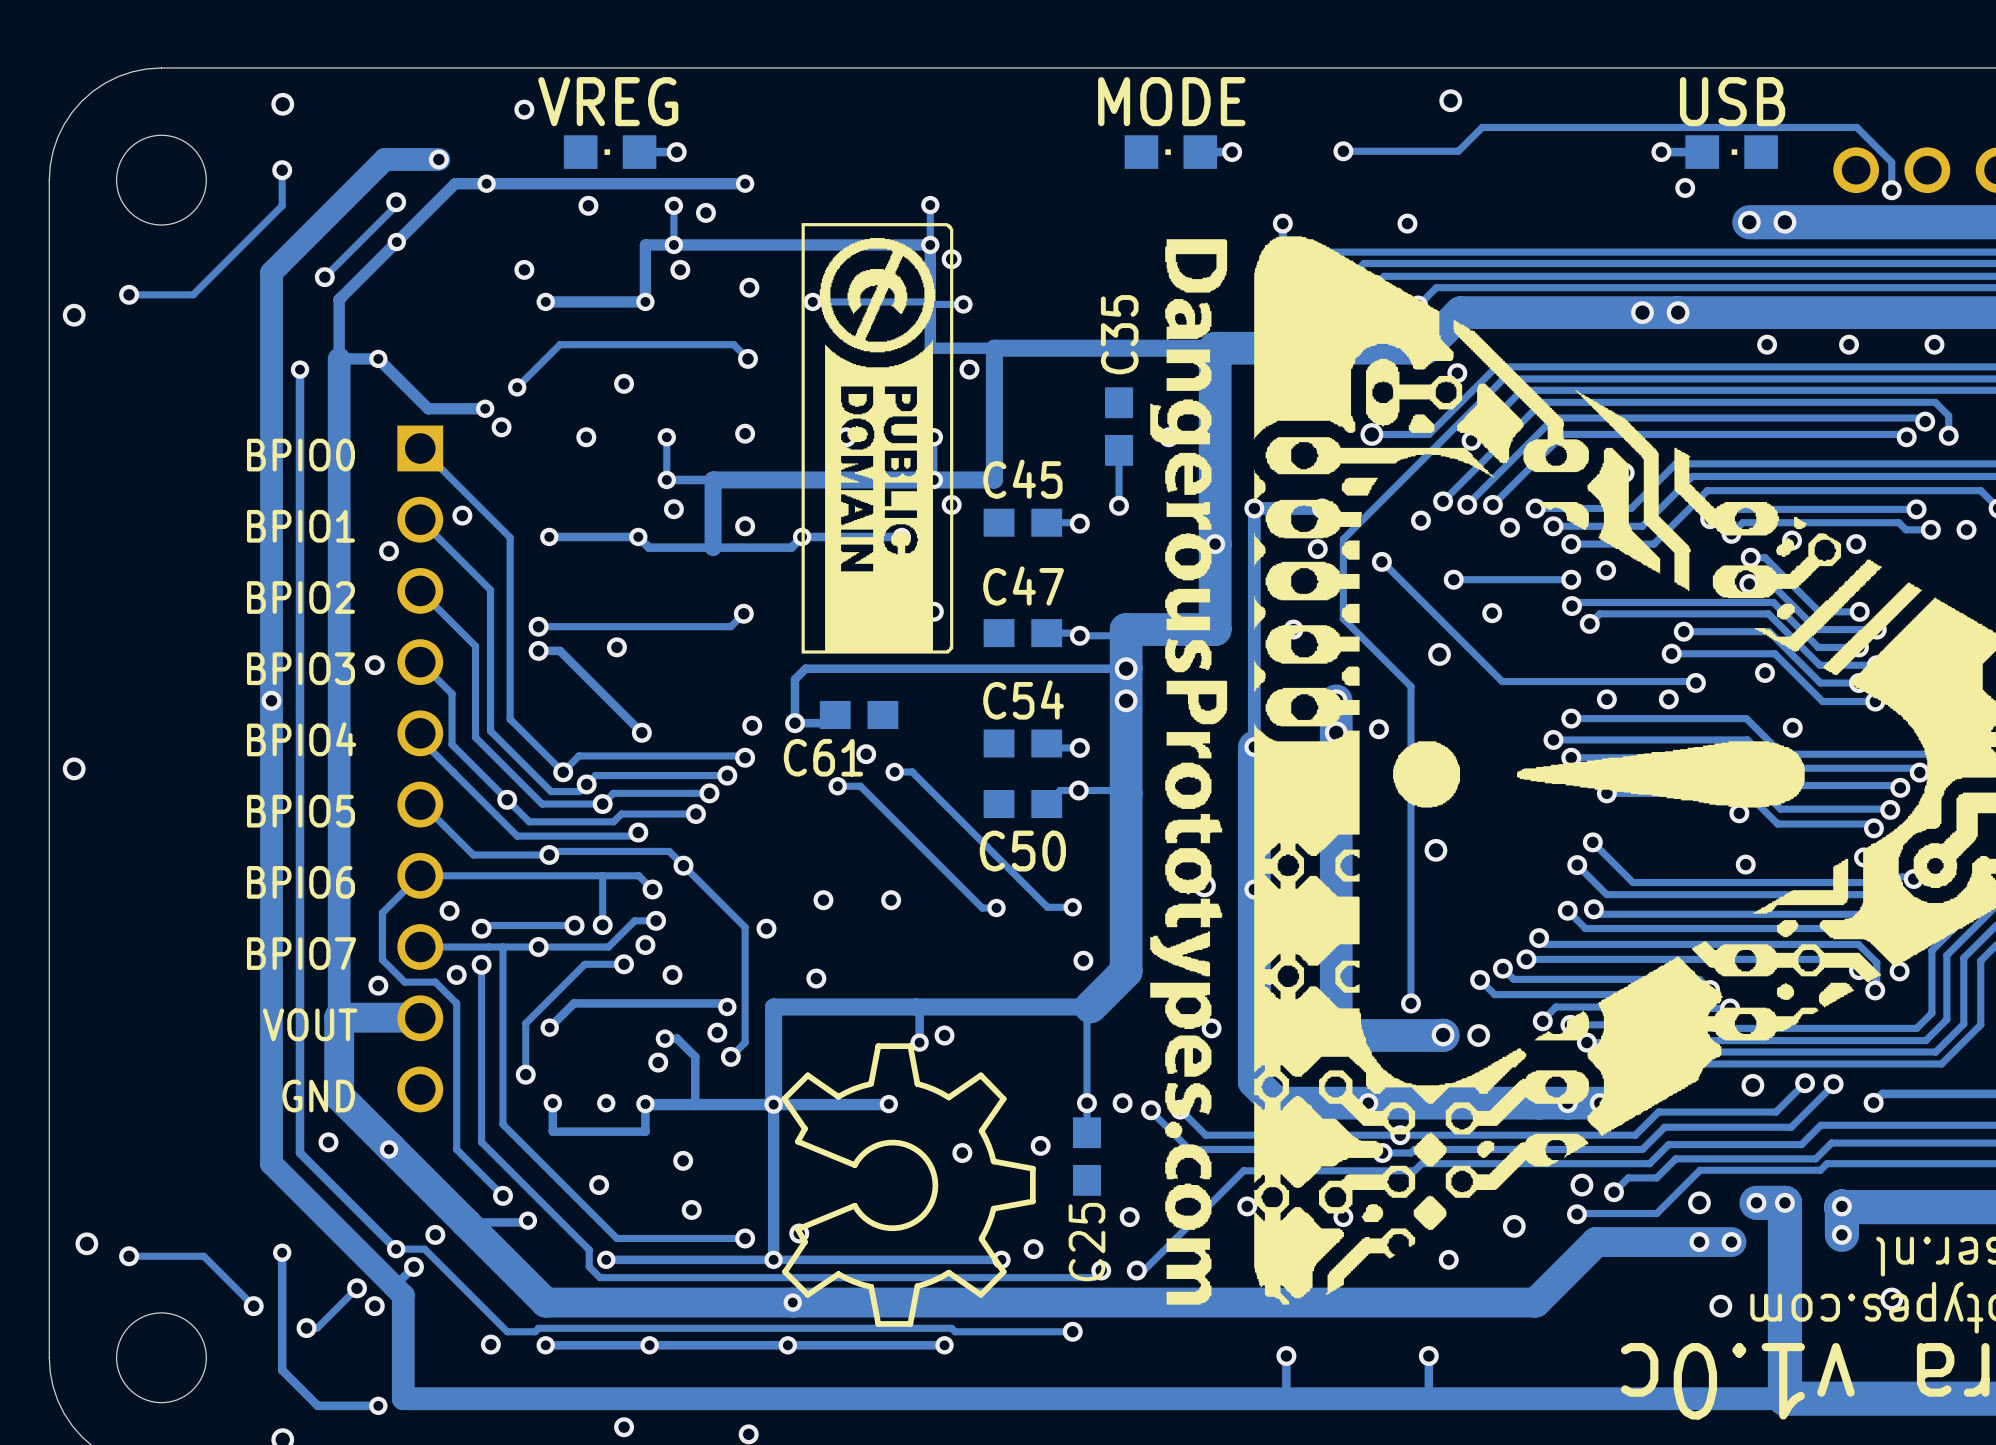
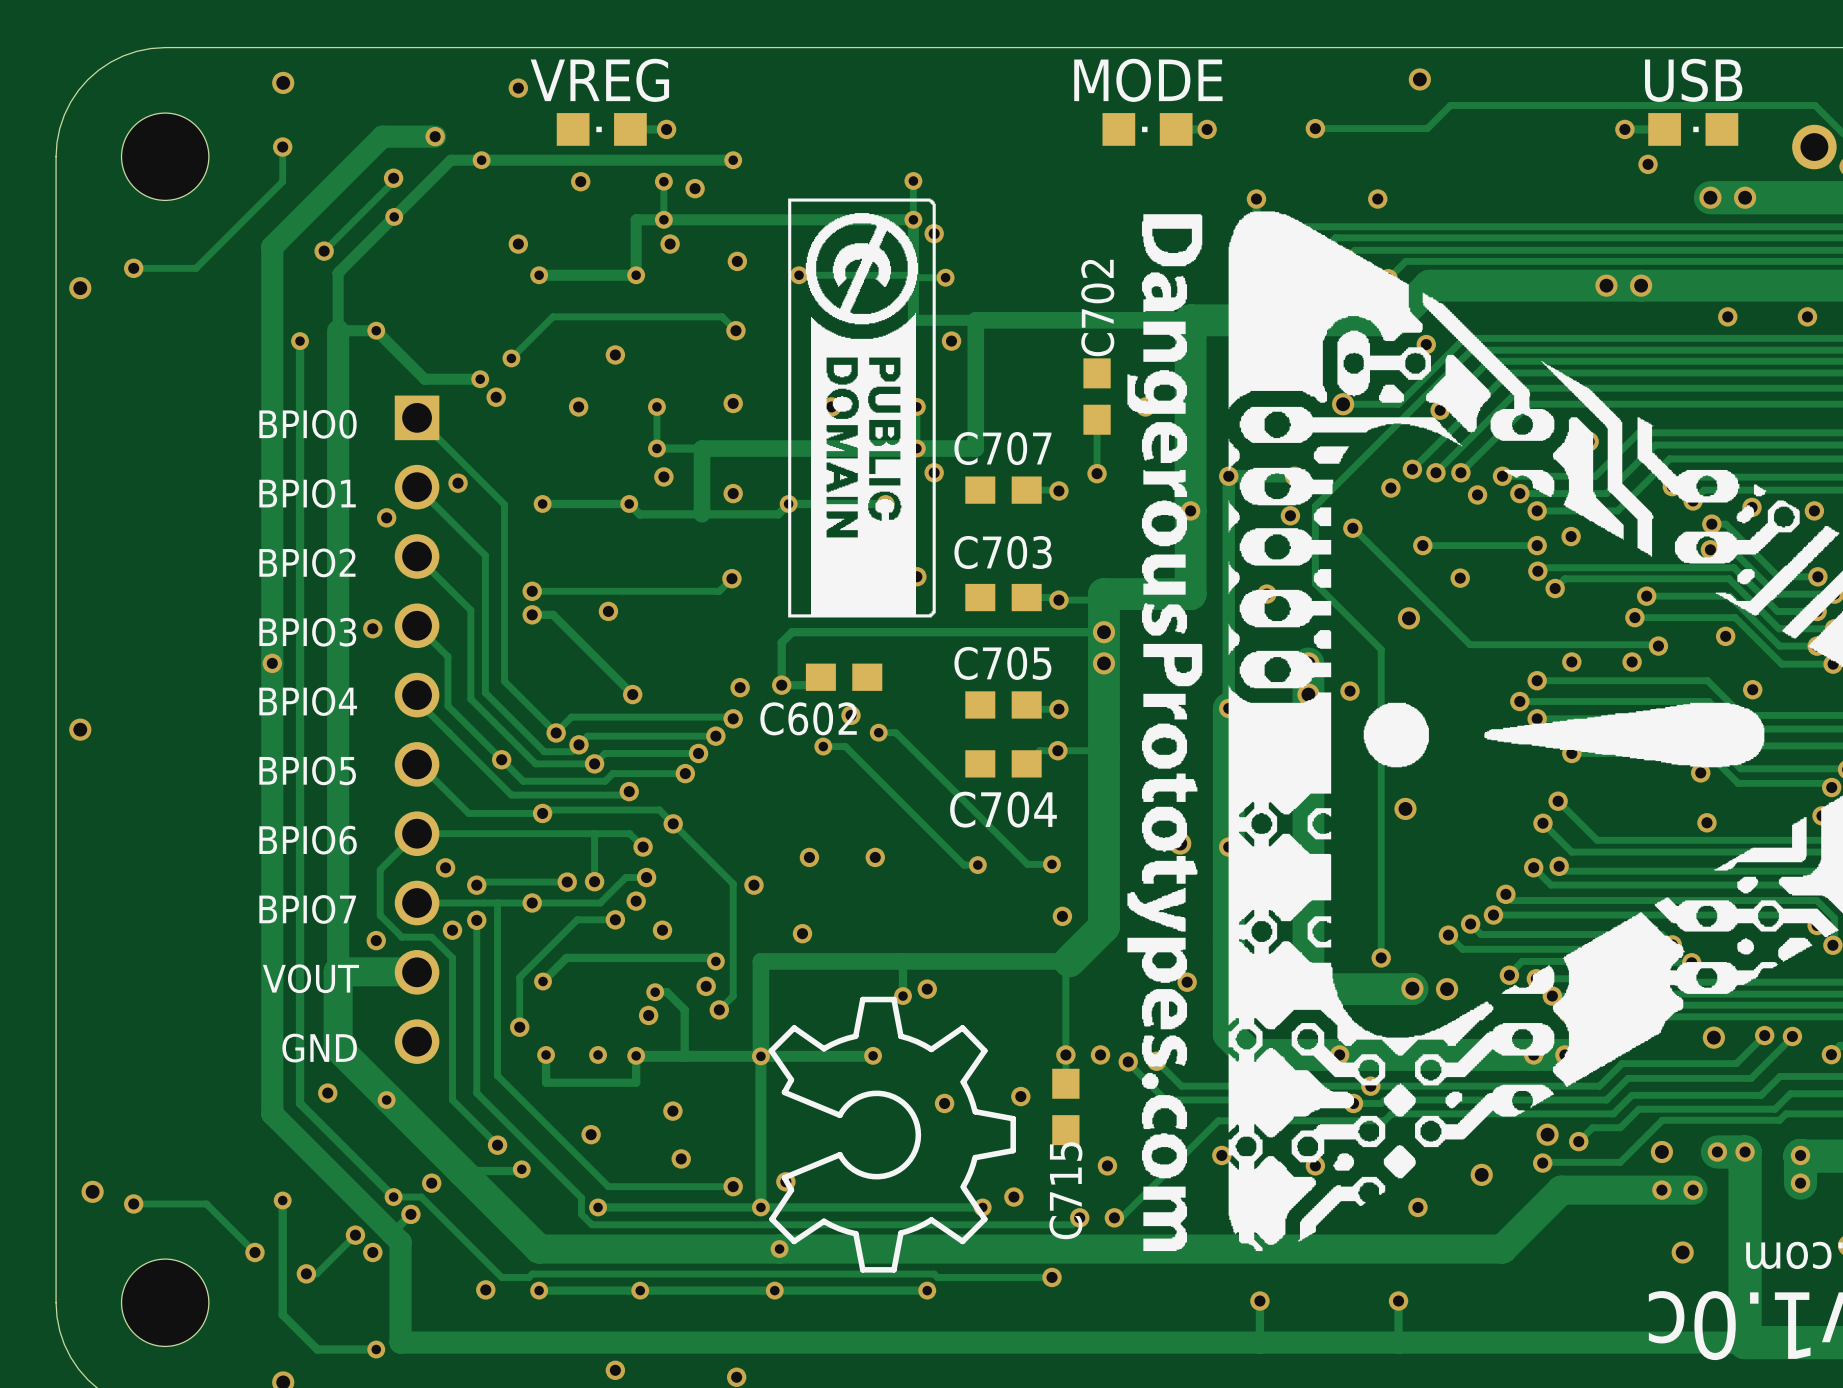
C35 name: C35 (1119, 334) -> C702 (1097, 308)
C45 name: C45 (1022, 479) -> C707 (1002, 448)
C47 name: C47 (1023, 586) -> C703 (1003, 552)
C54 name: C54 (1023, 699) -> C705 (1002, 663)
C61 name: C61 (823, 757) -> C602 (808, 718)
C50 name: C50 (1022, 851) -> C704 (1003, 809)
C25 name: C25 (1086, 1242) -> C715 (1065, 1190)

